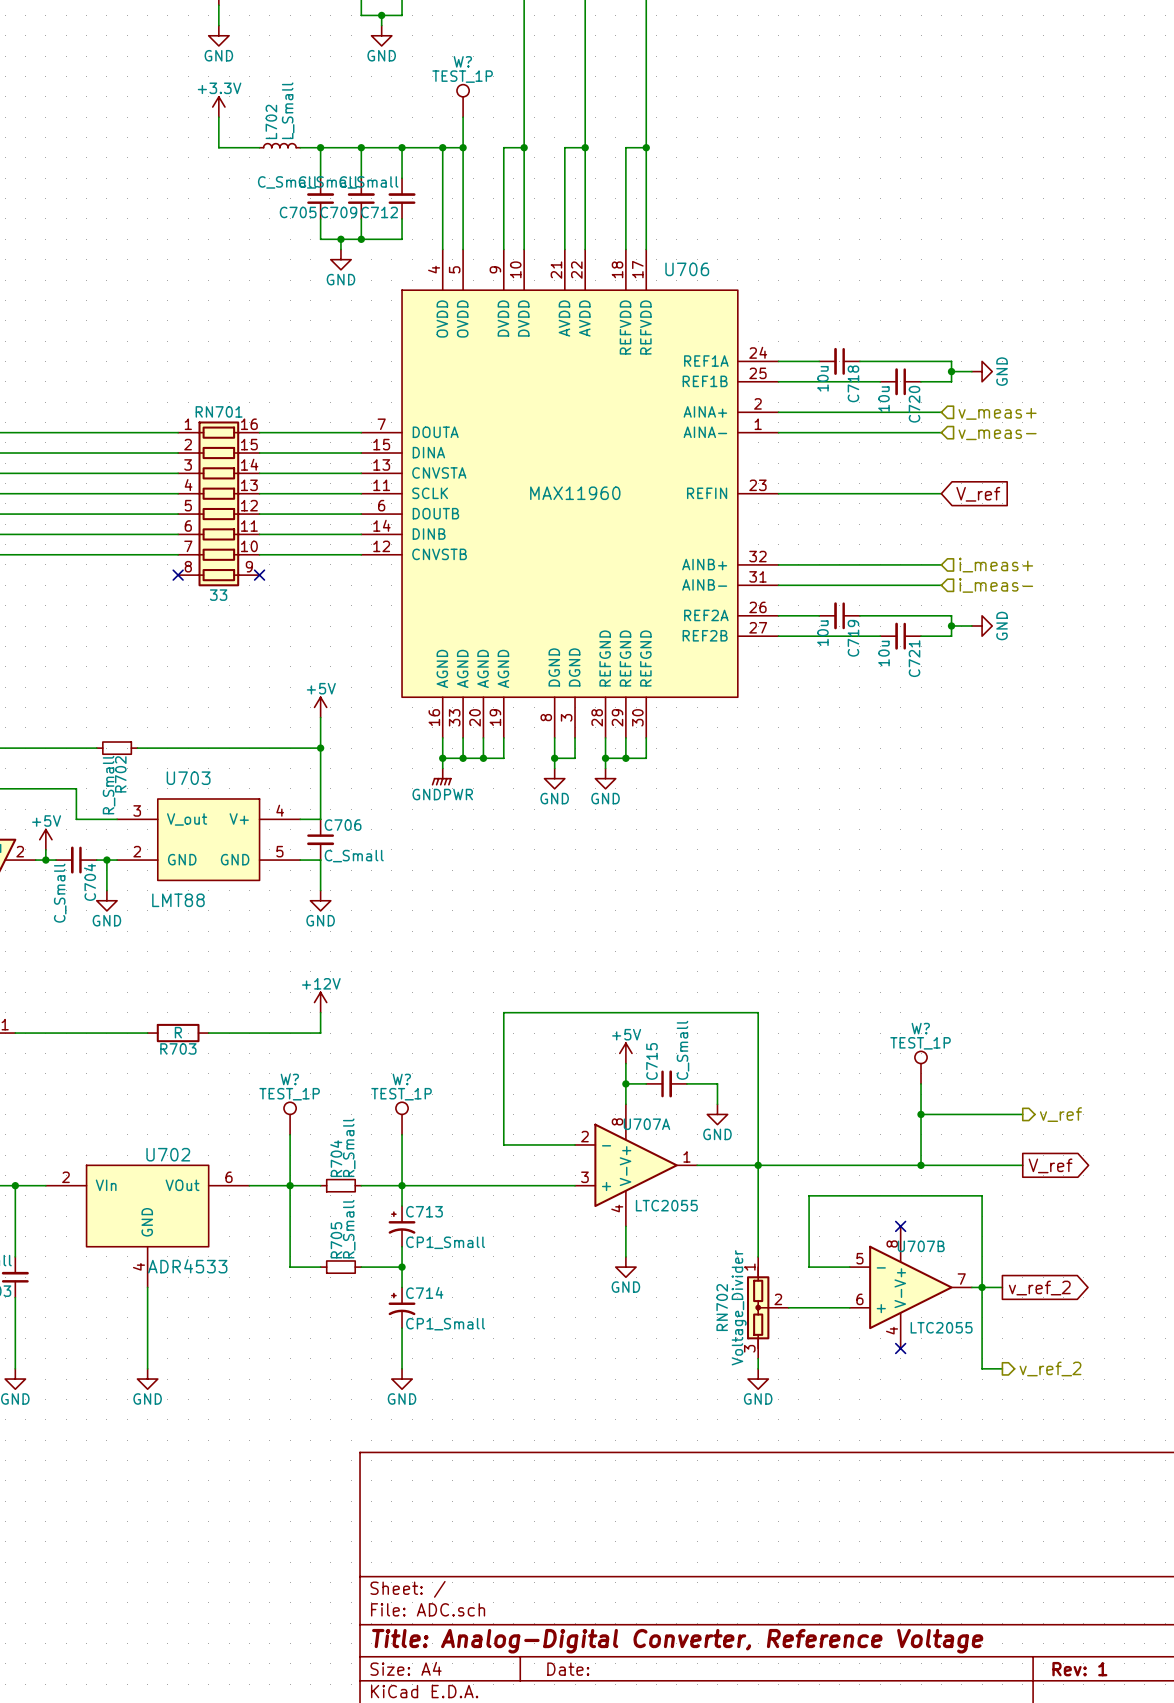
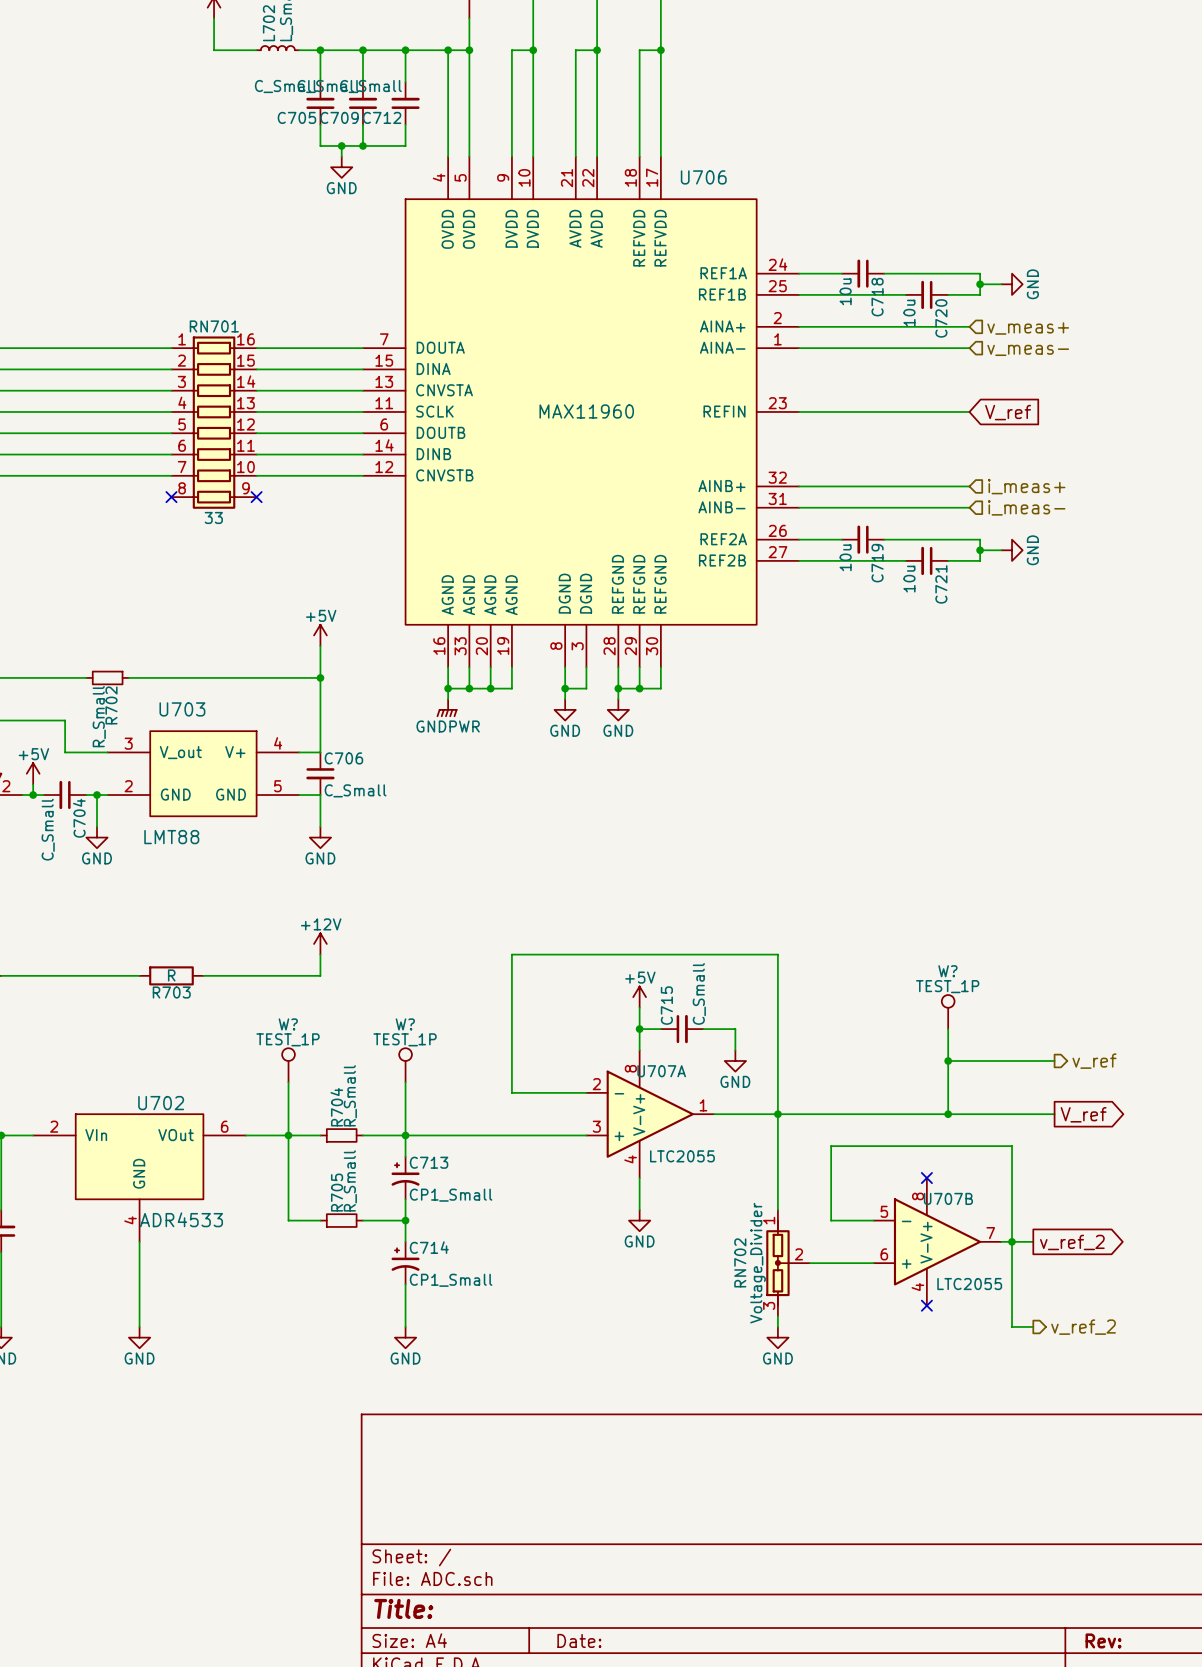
title block: Title: Analog-Digital Converter, Reference Voltage (677, 1641) -> Title: (403, 1608)
title block: Rev: 1 (1079, 1669) -> Rev: (1103, 1640)

